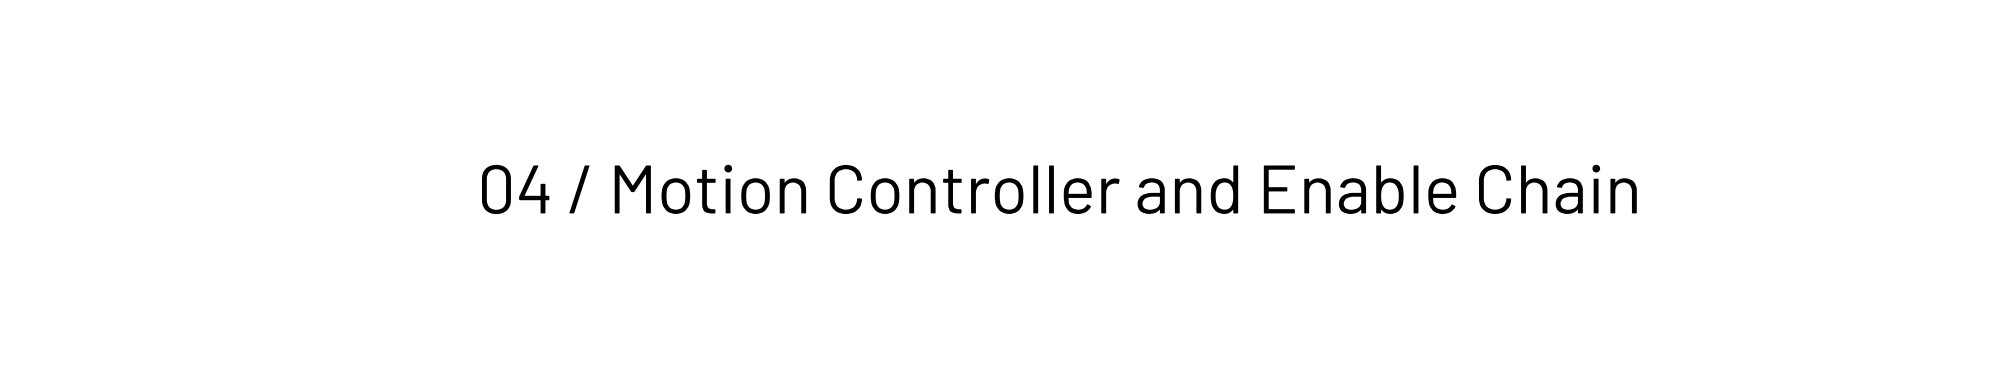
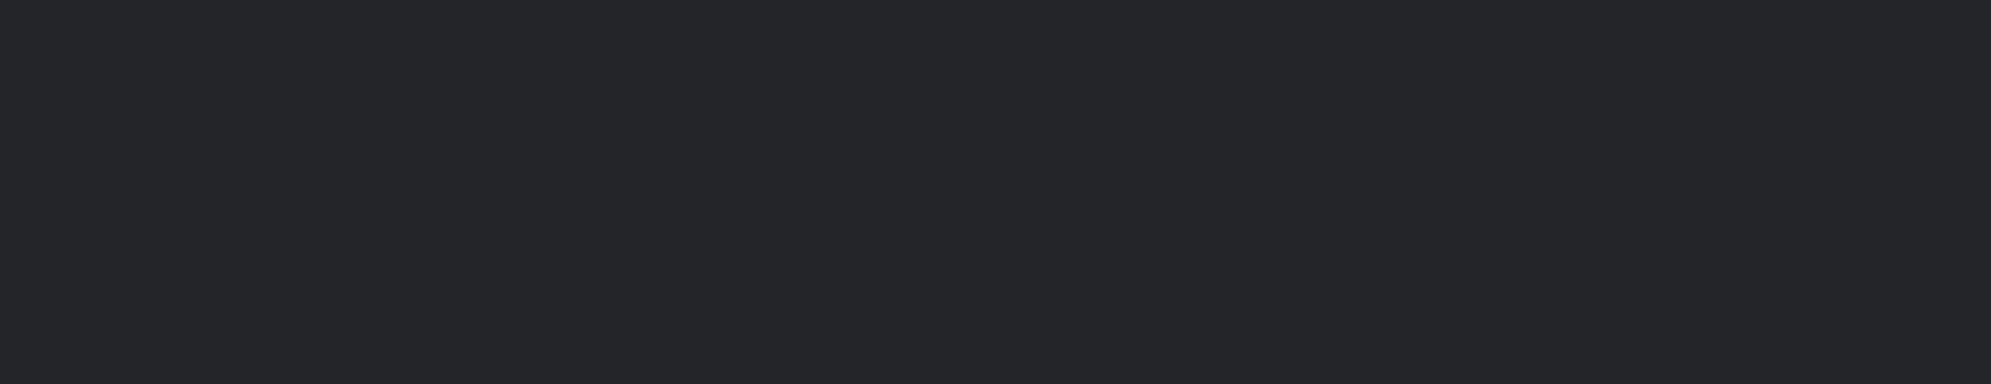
text: 04 / Motion Controller and Enable Chain (1059, 189) -> none

